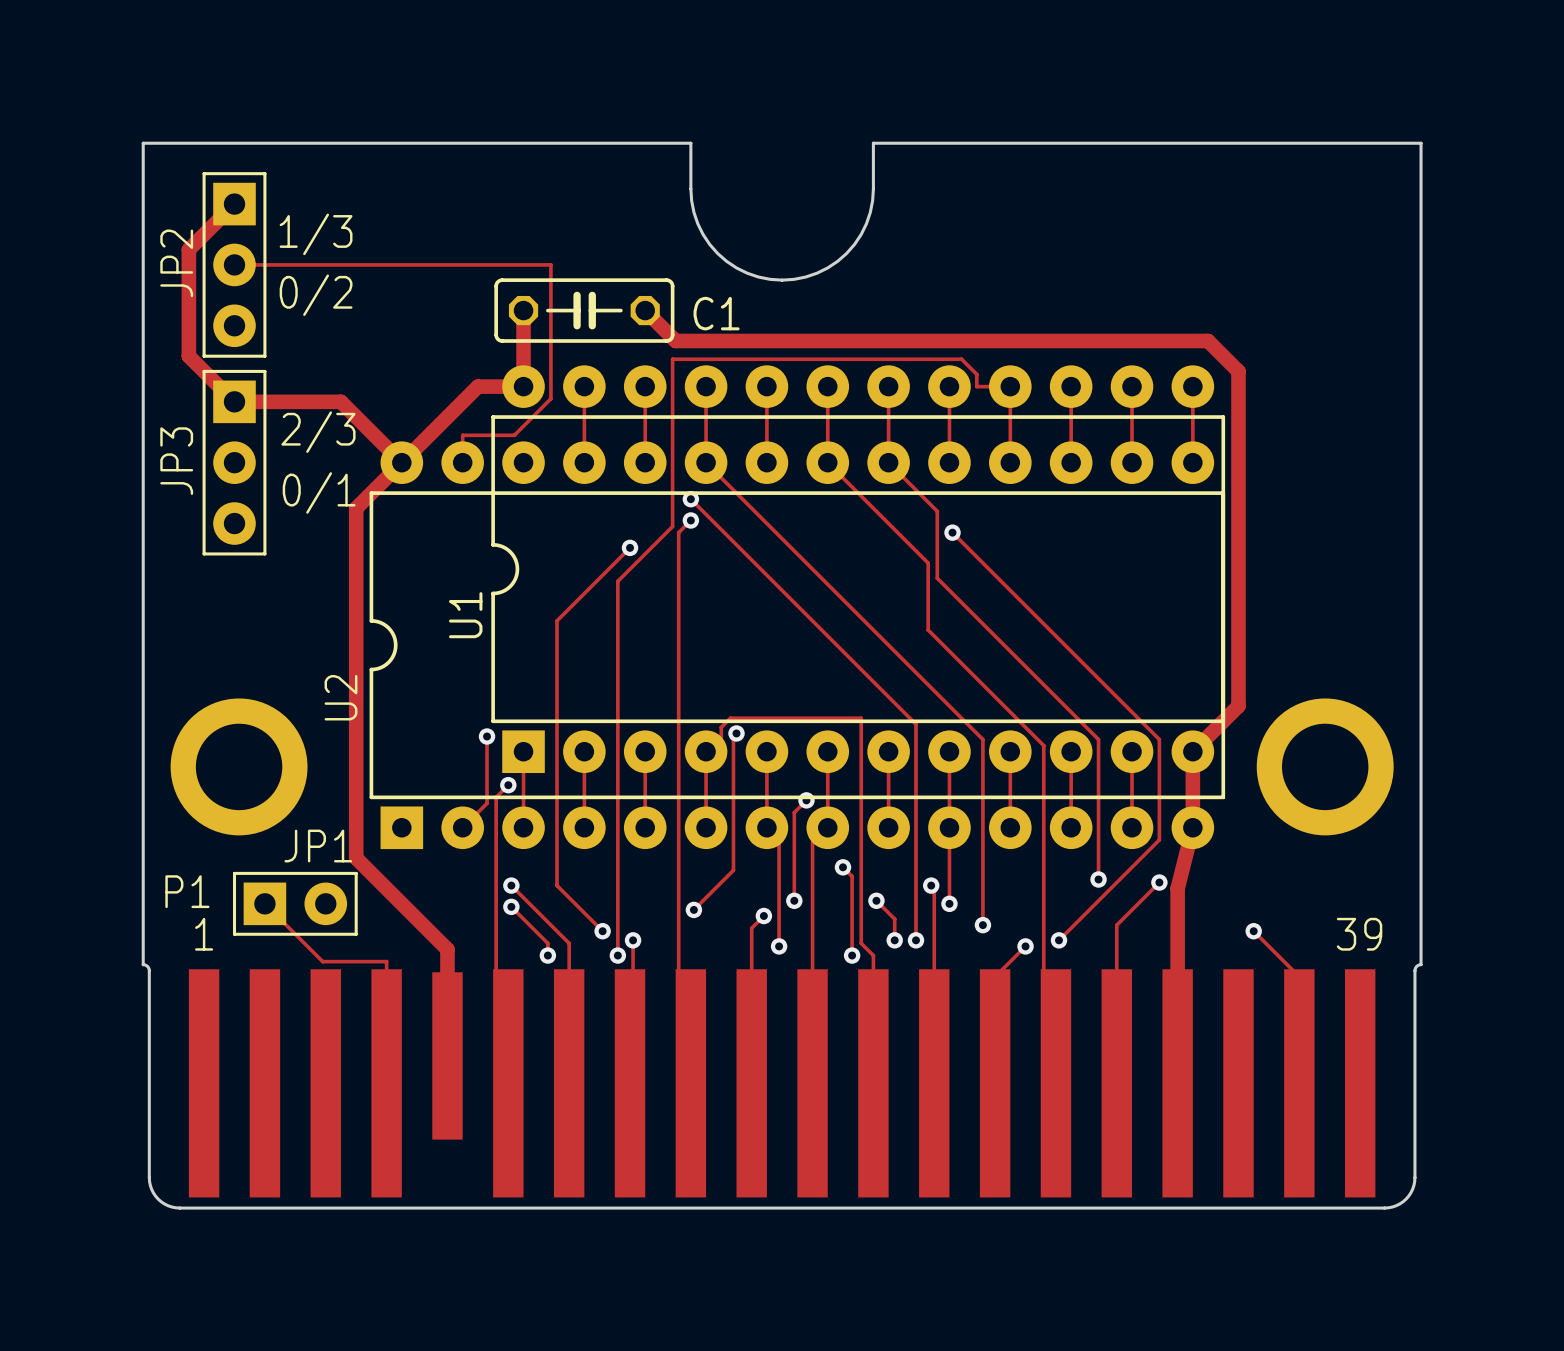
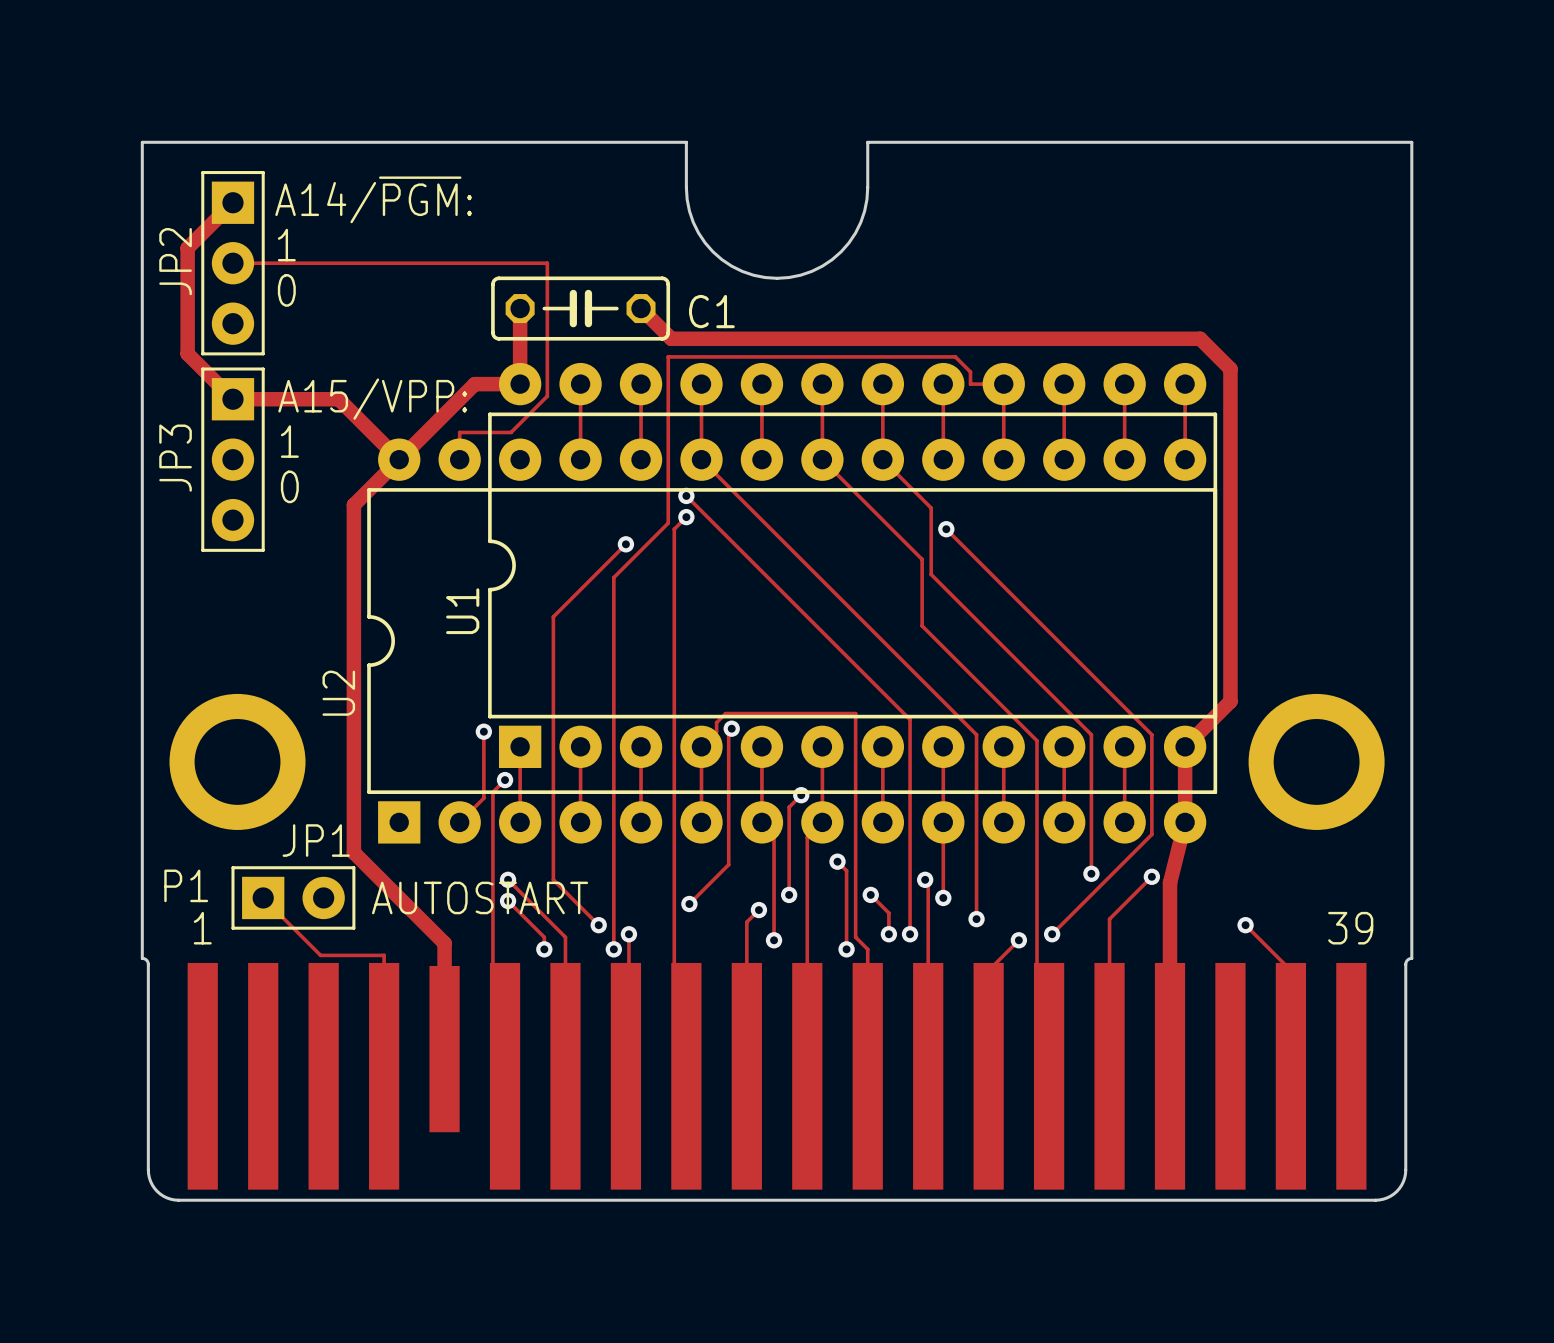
text: none -> A14/~{PGM}: (373, 199)
text: 1/3 (316, 234) -> none
text: none -> 1 (286, 245)
text: 0/2 (316, 295) -> 0 (286, 290)
text: none -> A15/VPP: (372, 399)
text: 2/3 (318, 432) -> none
text: none -> 1 (289, 441)
text: 0/1 (319, 492) -> 0 (289, 486)
text: none -> AUTOSTART (480, 897)

